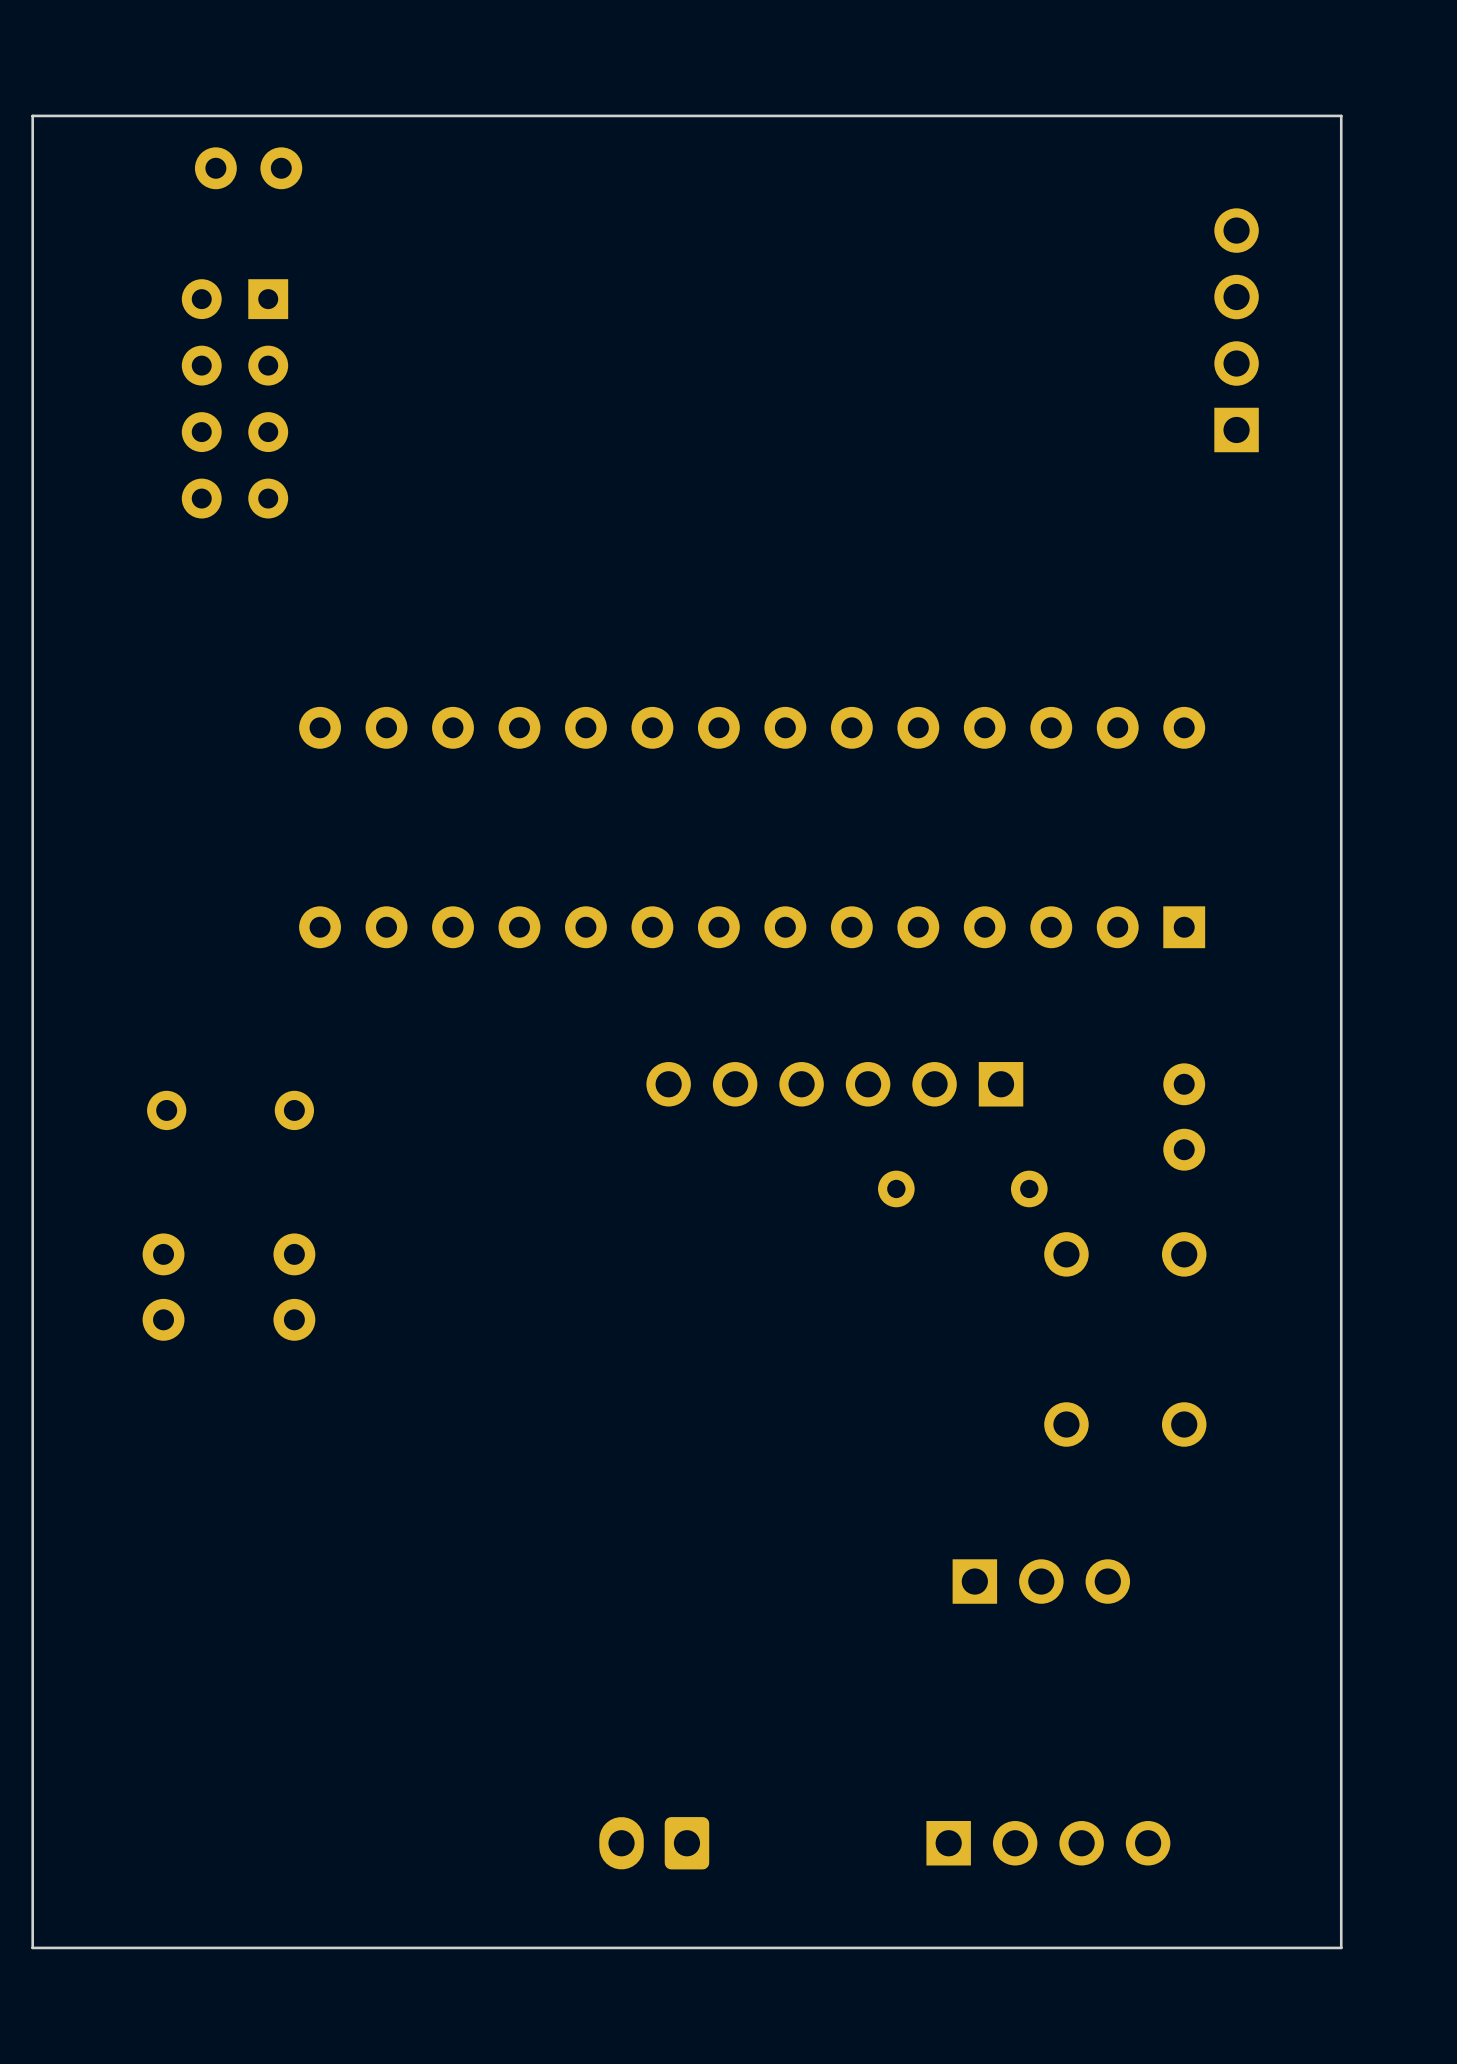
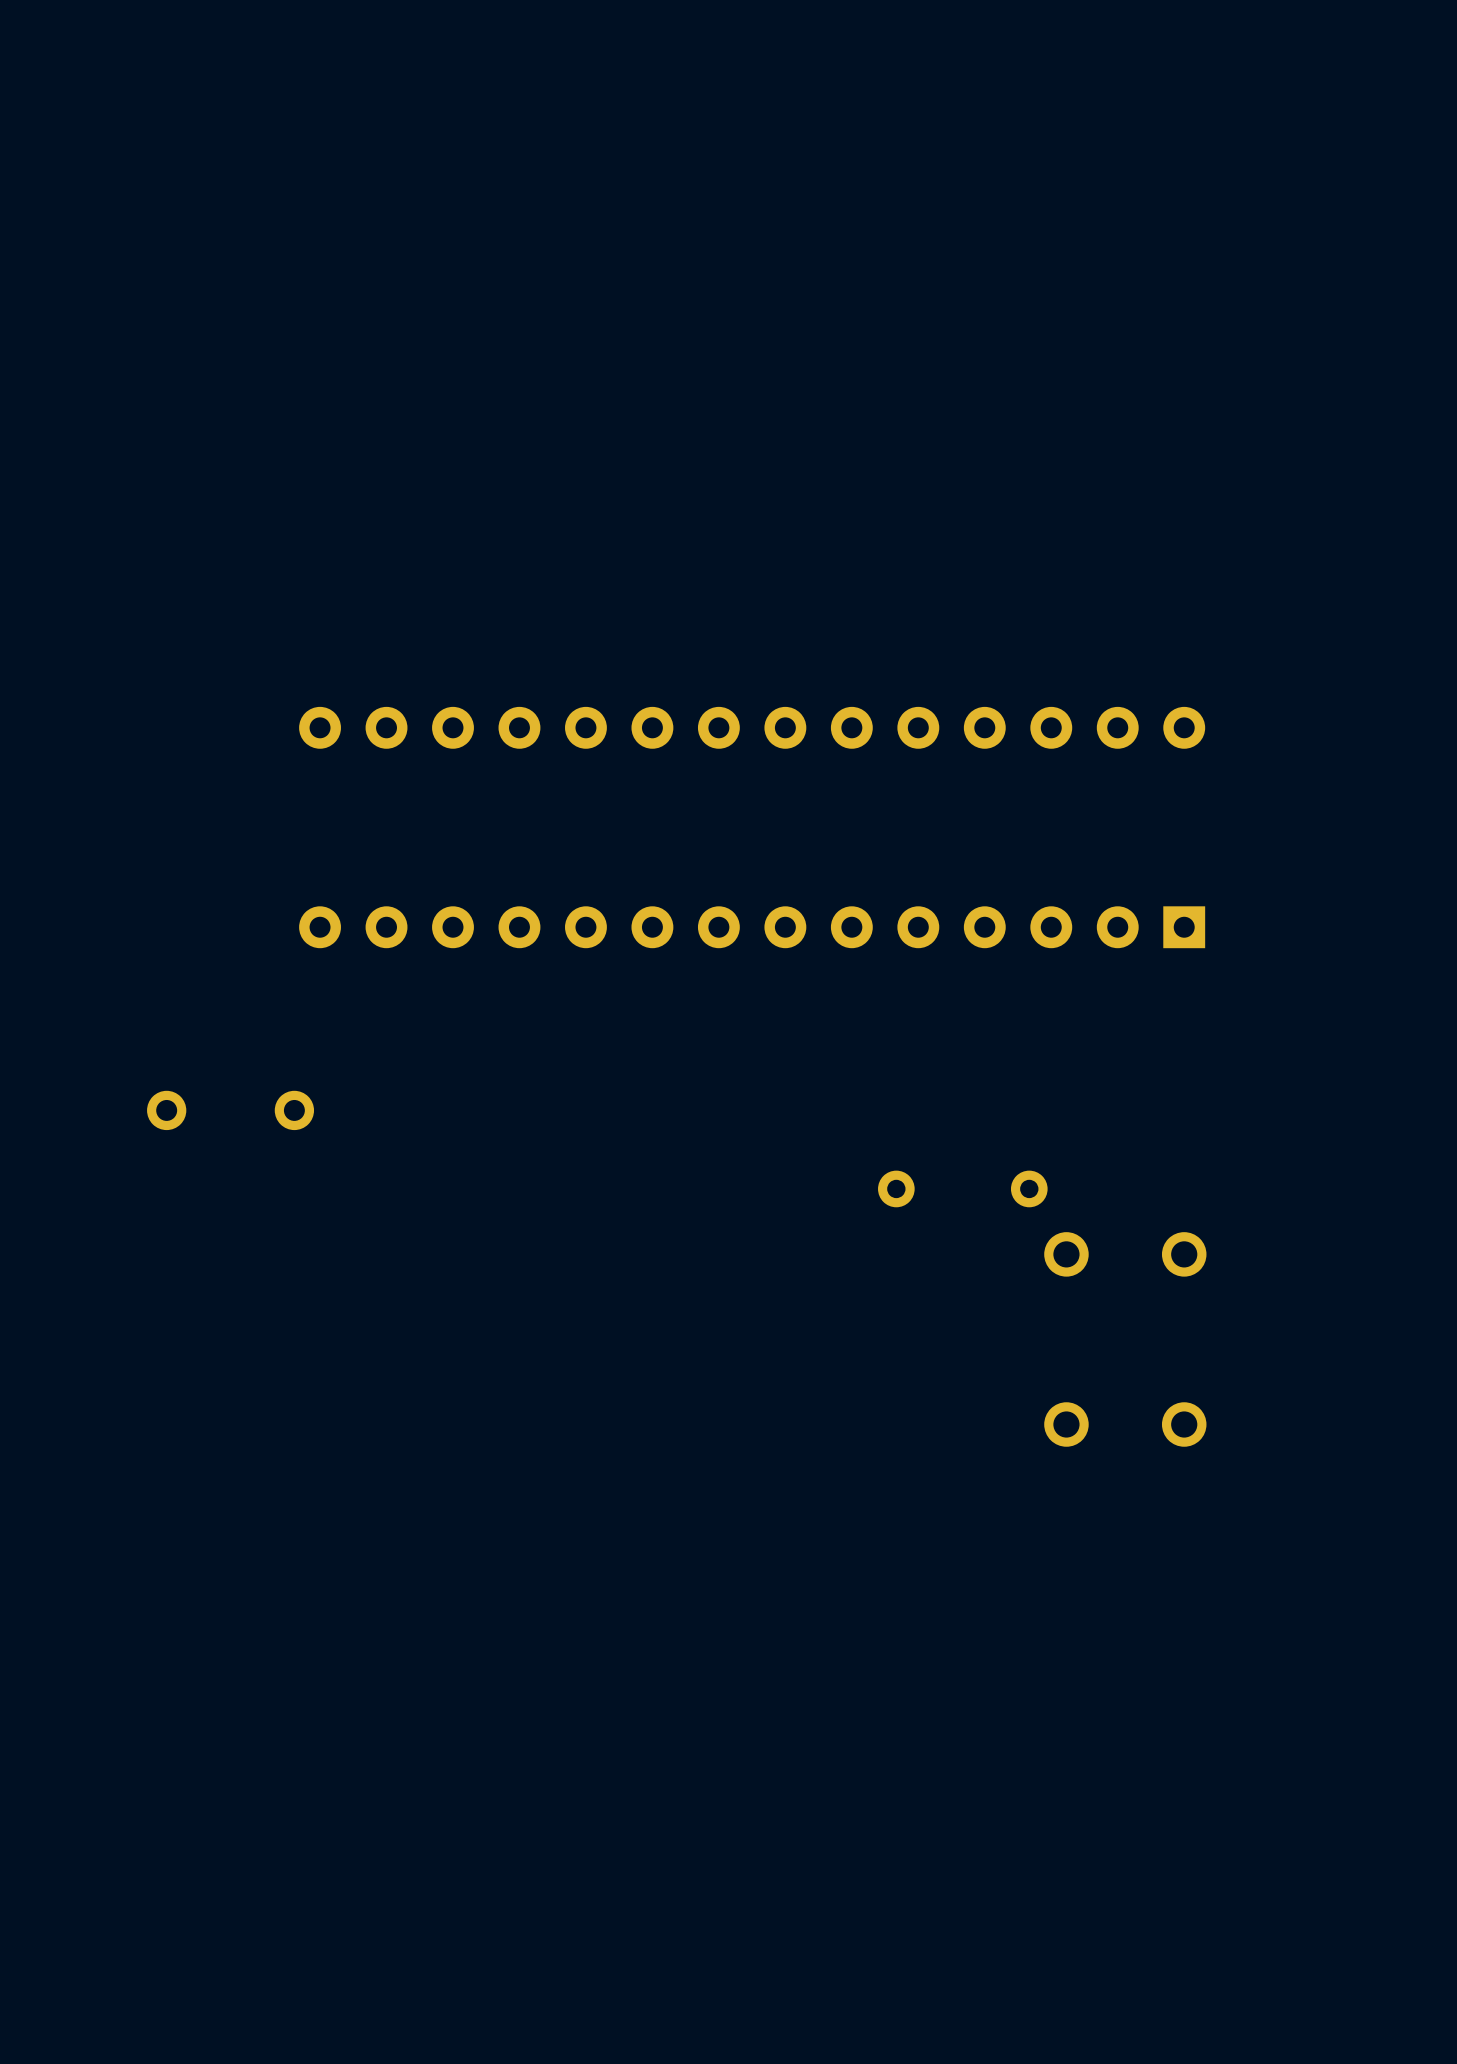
board edge: (1341, 115) (32, 115) (32, 1947) (1341, 1947) (1341, 115) -> none
part: (248, 168) -> none
part: (1236, 330) -> none
part: (234, 398) -> none
part: (834, 1084) -> none
part: (1184, 1116) -> none
part: (163, 1287) -> none
part: (294, 1287) -> none
part: (1041, 1581) -> none
part: (654, 1843) -> none
part: (1048, 1843) -> none

